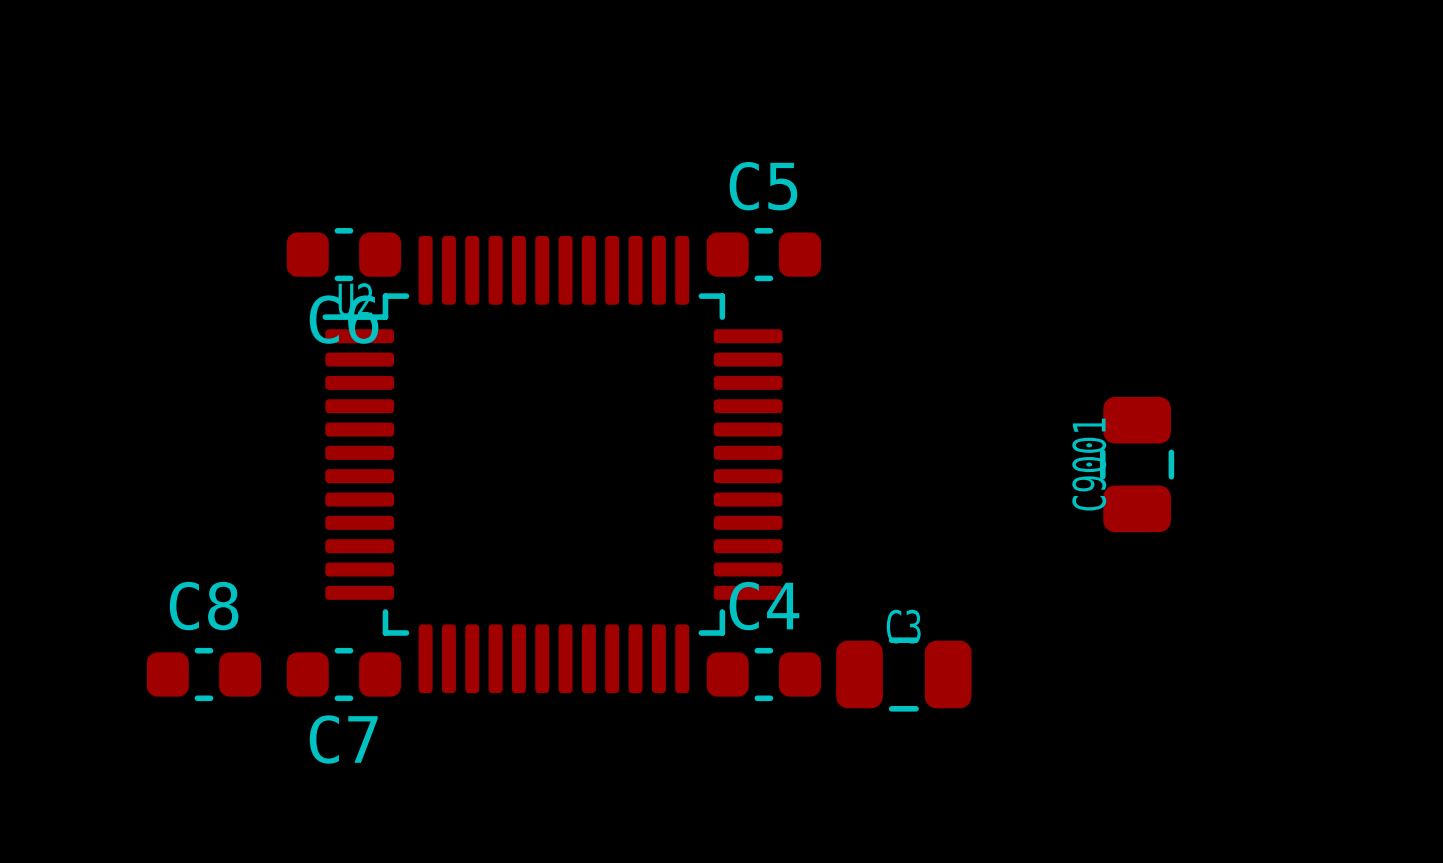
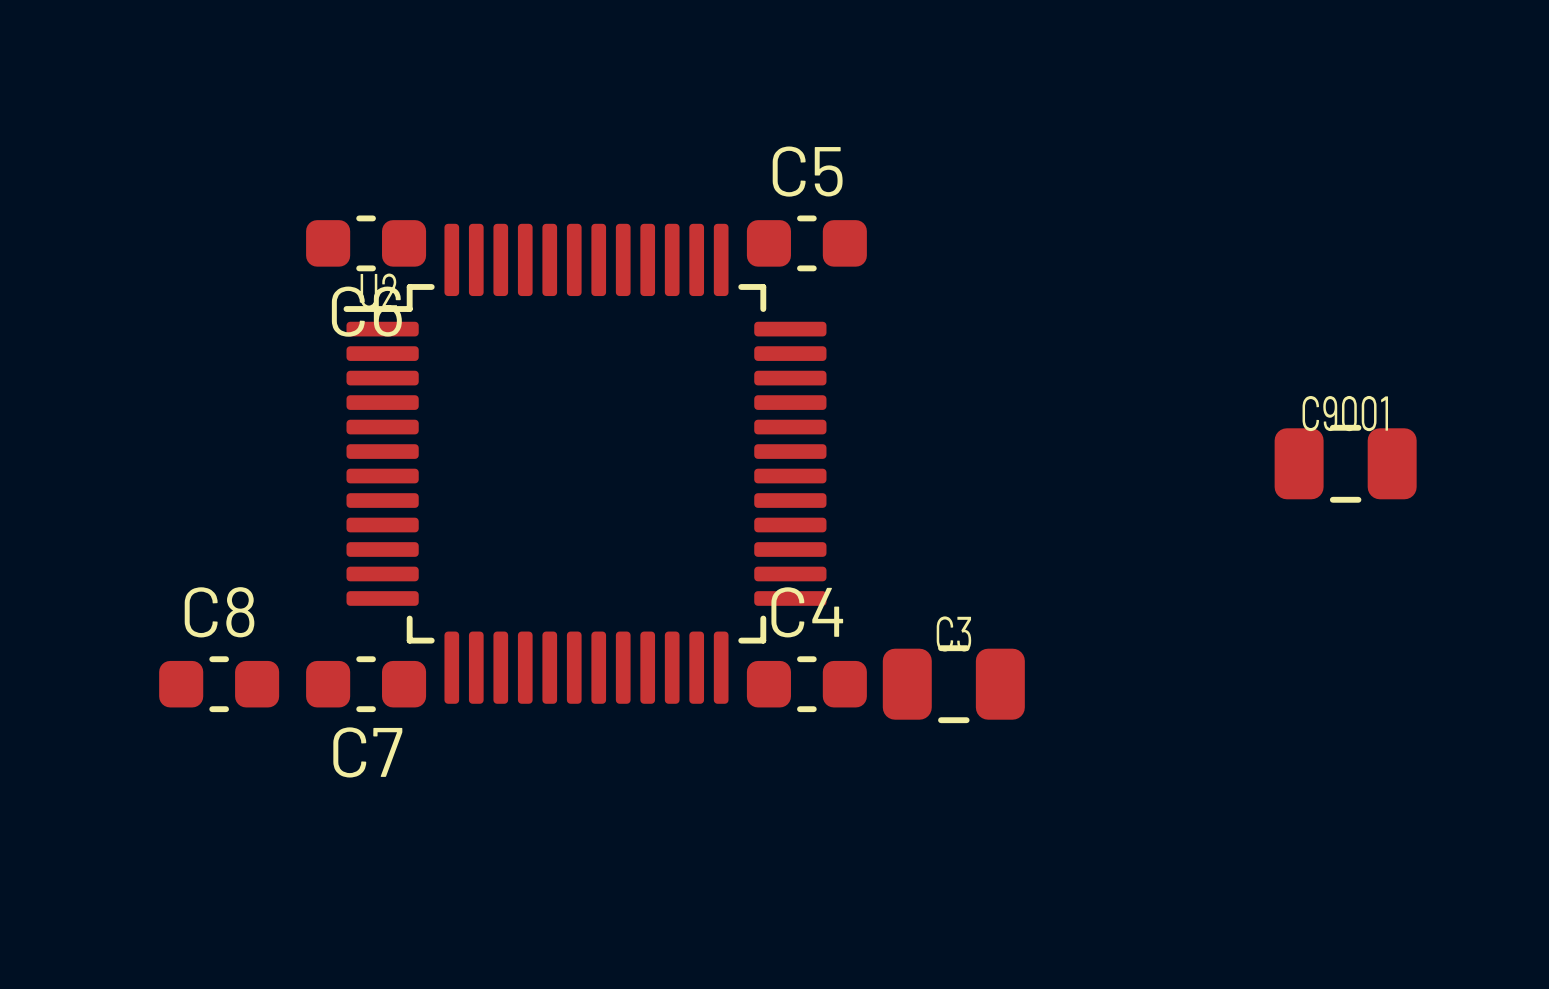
C9001 rotation: 0° (1137, 464) -> 90° clockwise (1345, 463)
C9001 position: (1137, 464) -> (1345, 463)

